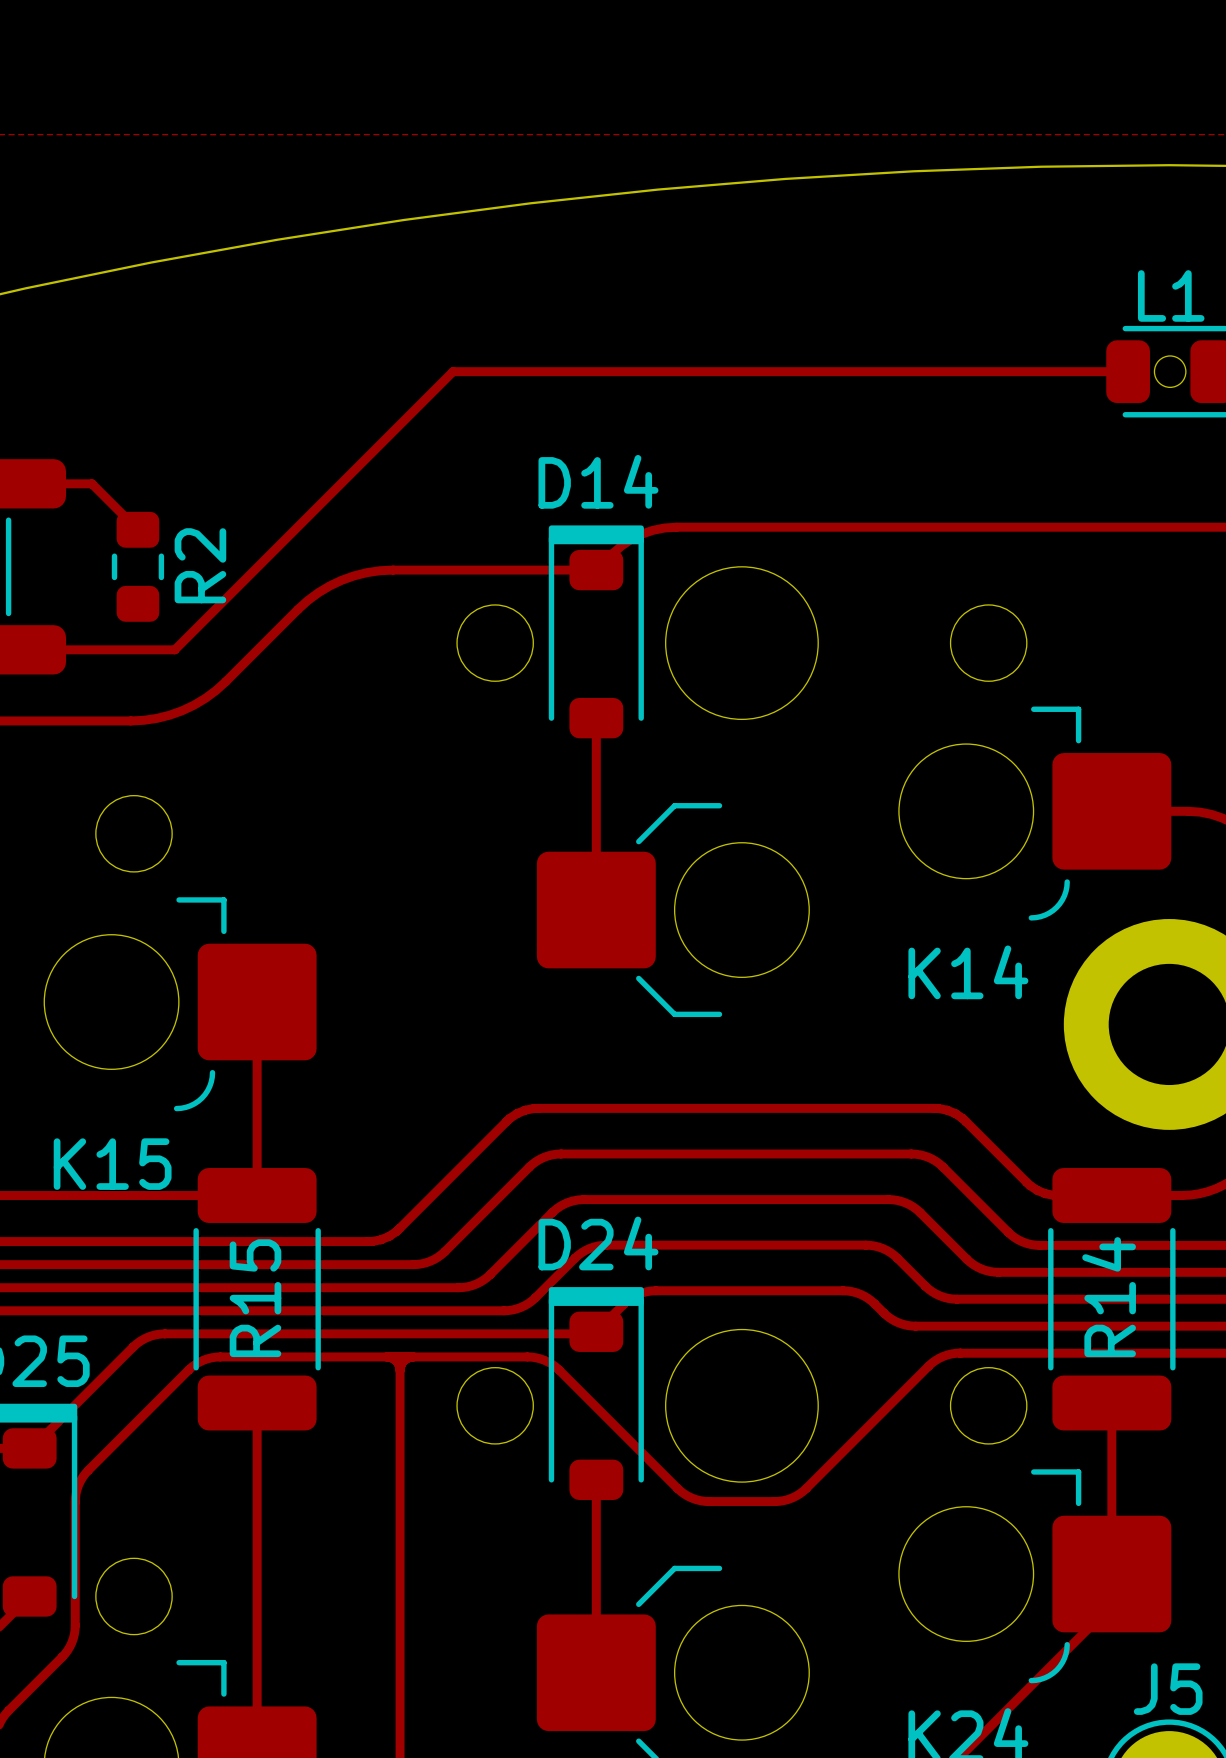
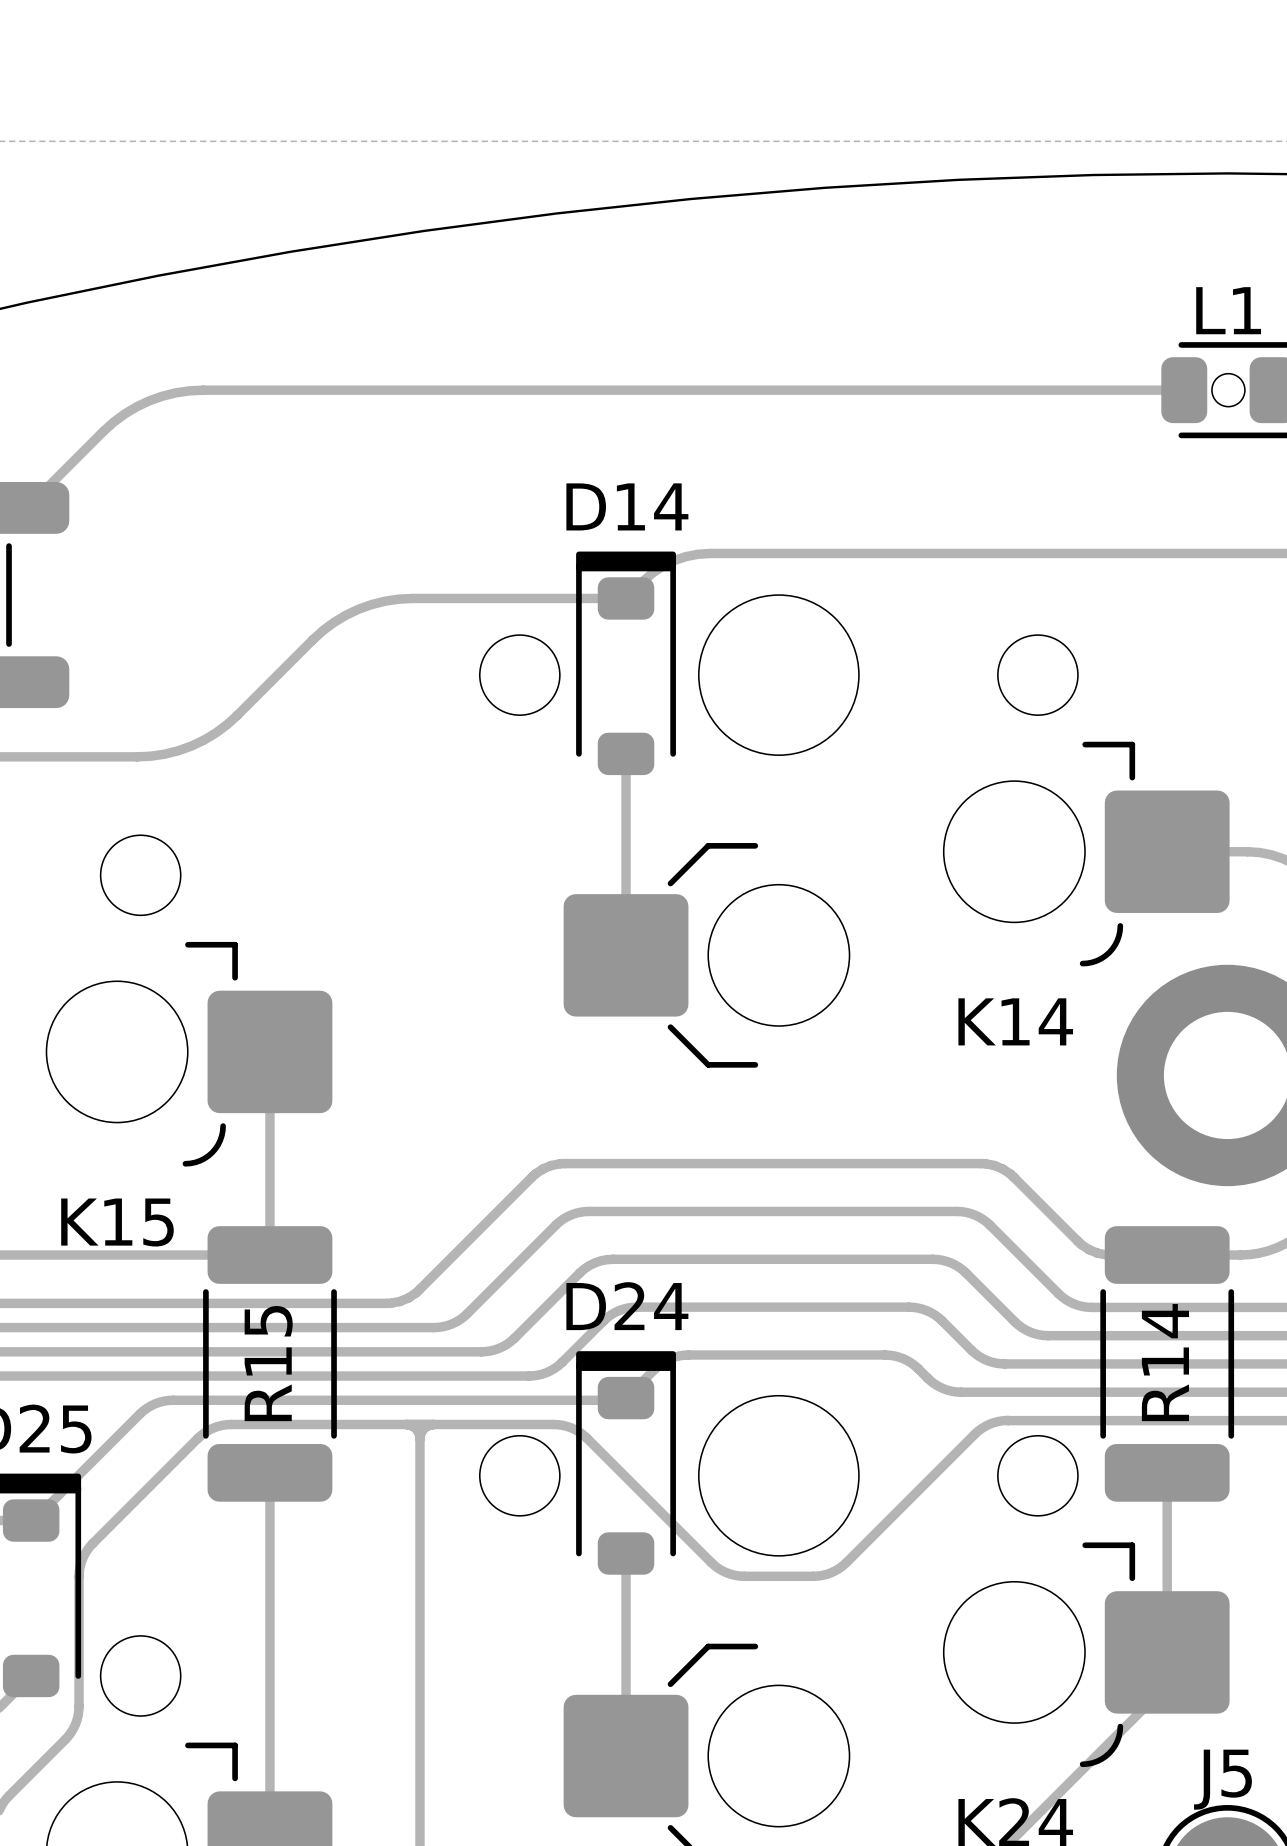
track: (453, 371) (174, 649) (25, 649) -> (475, 390) (203, 390) (162, 396) (136, 406) (113, 422) (26, 507)
track: (25, 483) (91, 483) (137, 529) -> none
R2: (137, 566) -> none

